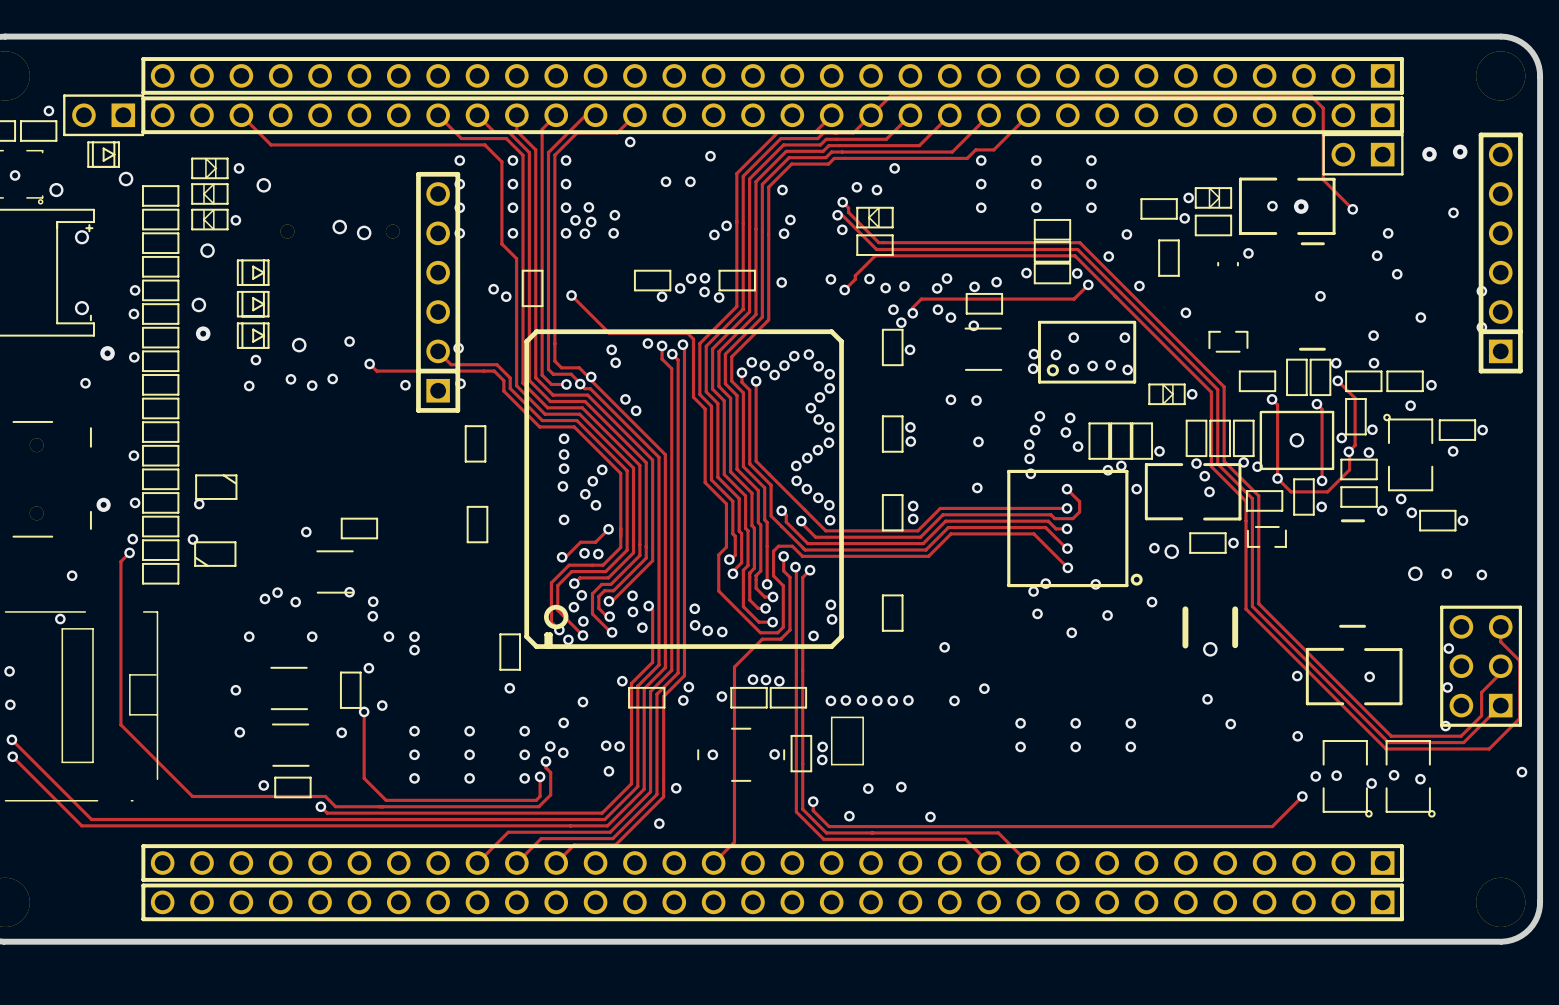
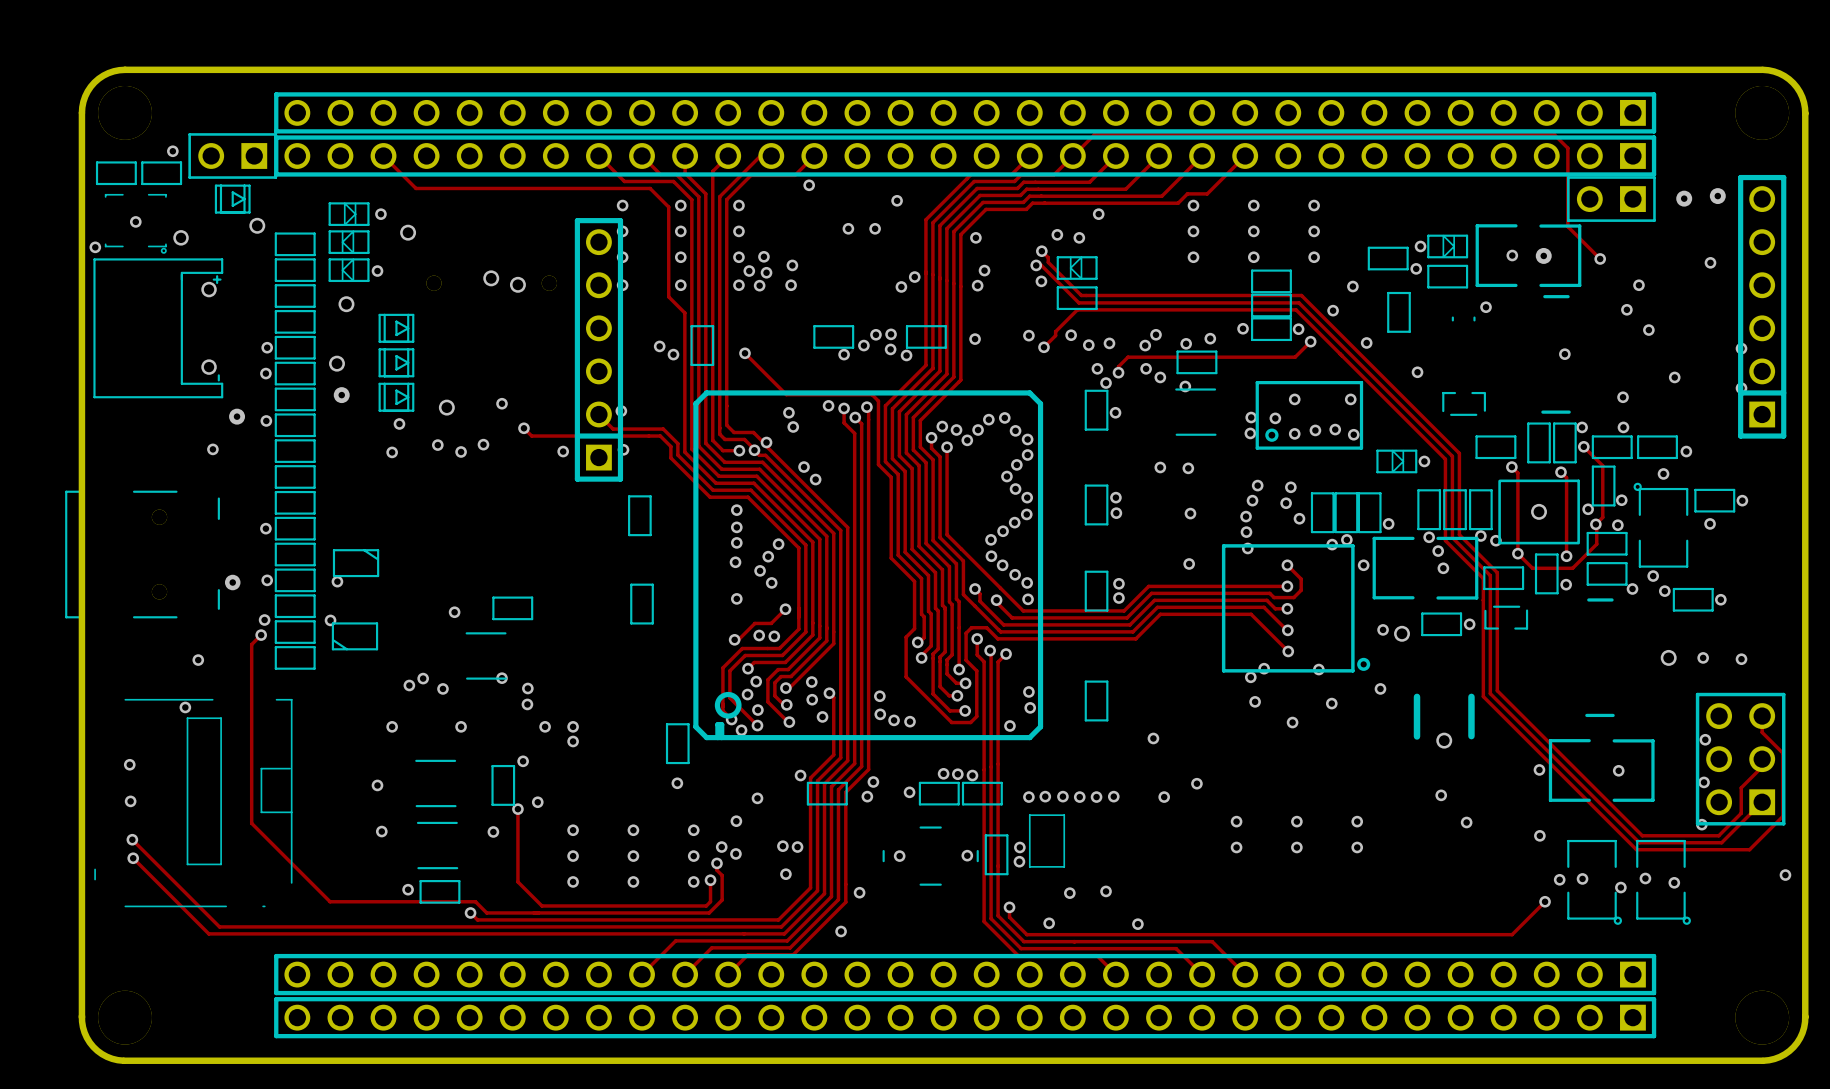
track: (789, 630) (780, 639) (762, 639) (734, 667) (734, 842) (713, 863) -> (984, 719) (984, 921) (1018, 955) (1096, 955) (1115, 974)

